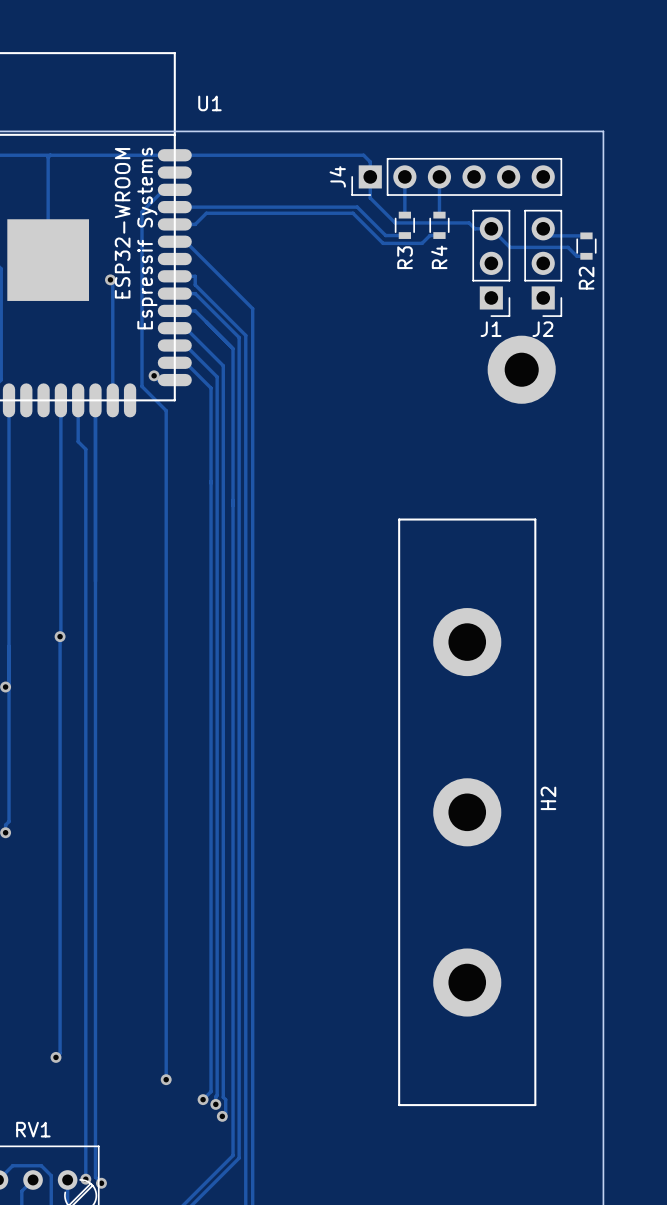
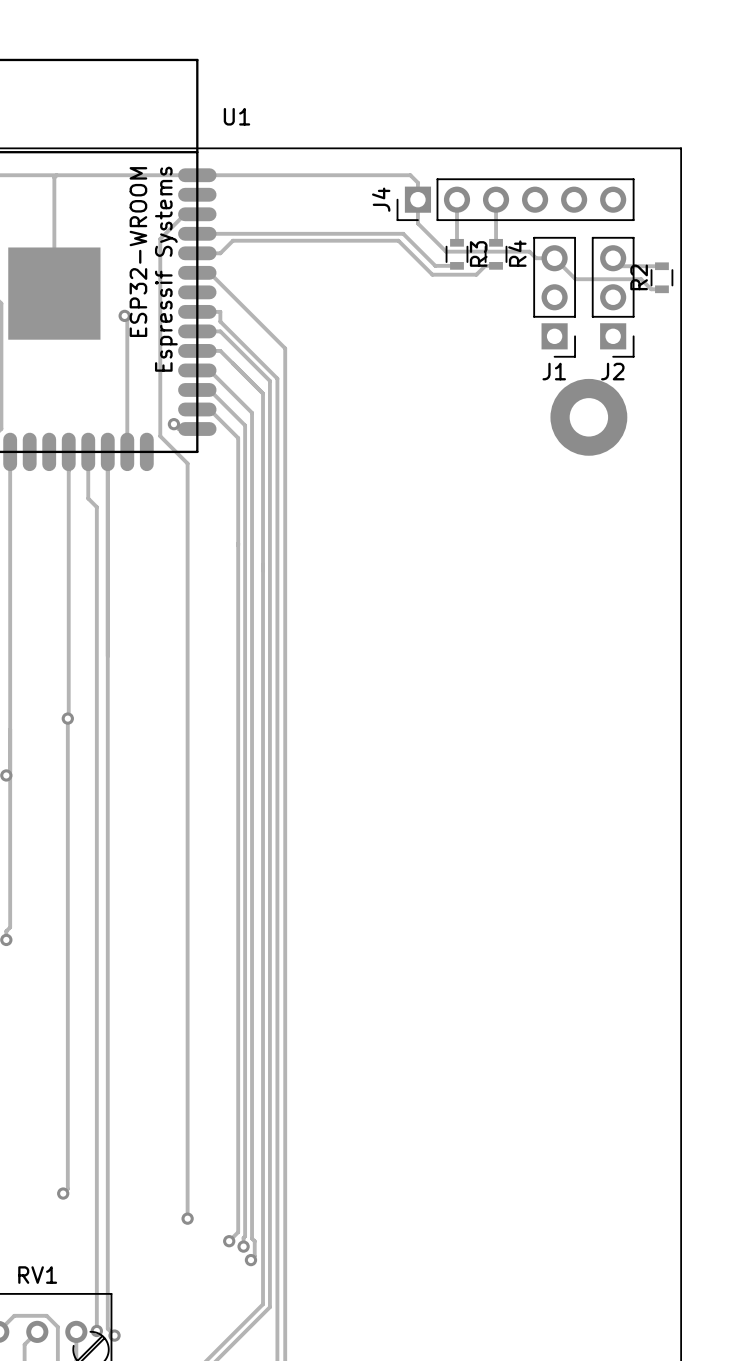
R3 name position: R3 (405, 257) -> R3 (478, 253)
R4 name position: R4 (439, 257) -> R4 (517, 253)
R2 name position: R2 (586, 278) -> R2 (639, 277)
H2: (467, 812) -> none

